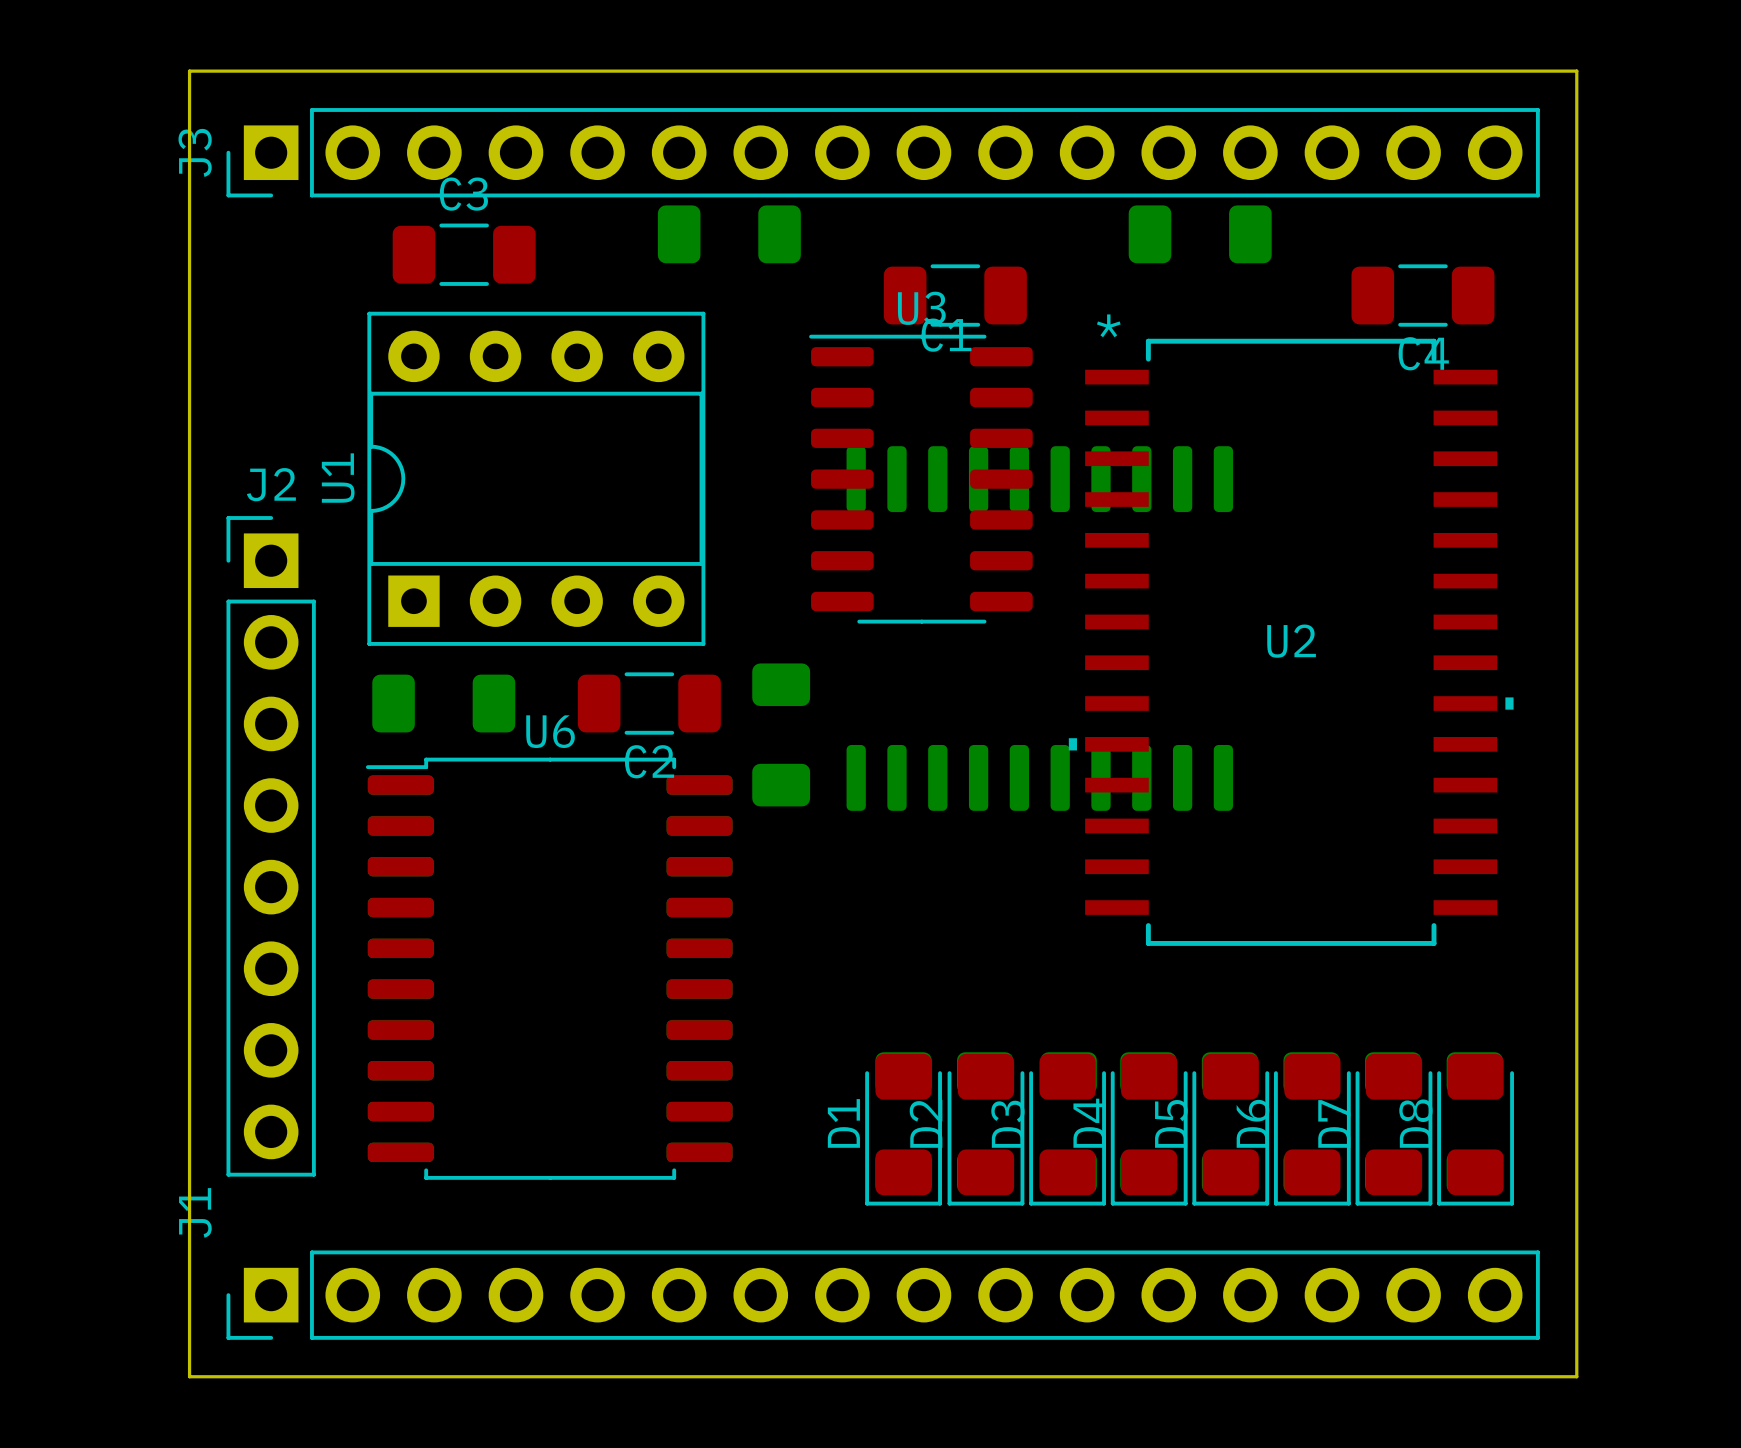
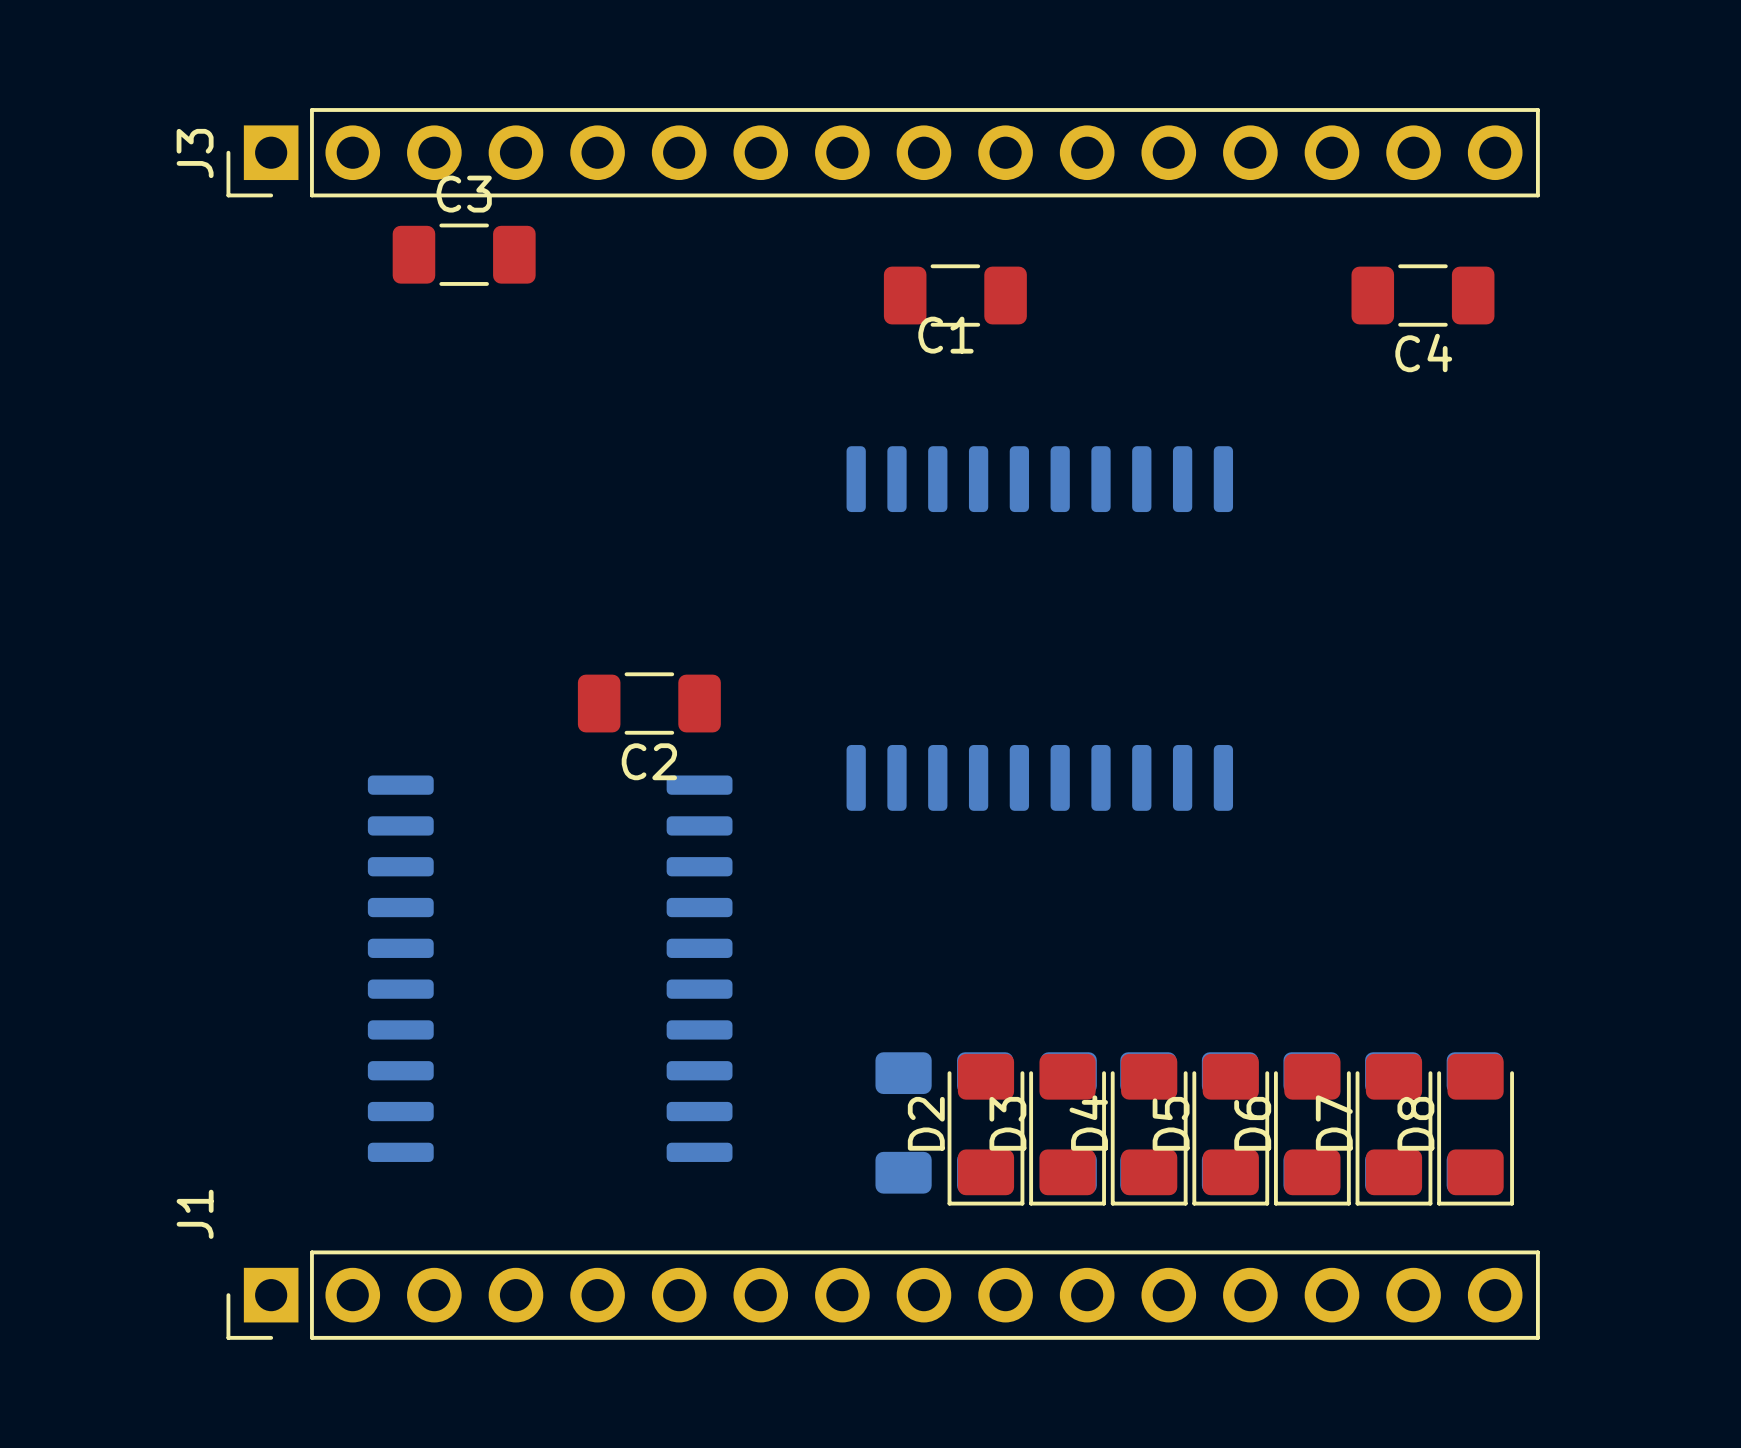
board edge: (189, 71) (1576, 71) (1576, 1376) (189, 1376) (189, 71) -> none
part: (729, 234) -> none
part: (1200, 234) -> none
U1: (536, 478) -> none
U3: (920, 479) -> none
U2: (1291, 642) -> none
part: (443, 703) -> none
part: (781, 734) -> none
J2: (271, 846) -> none
U6: (549, 968) -> none
D1: (903, 1129) -> none

